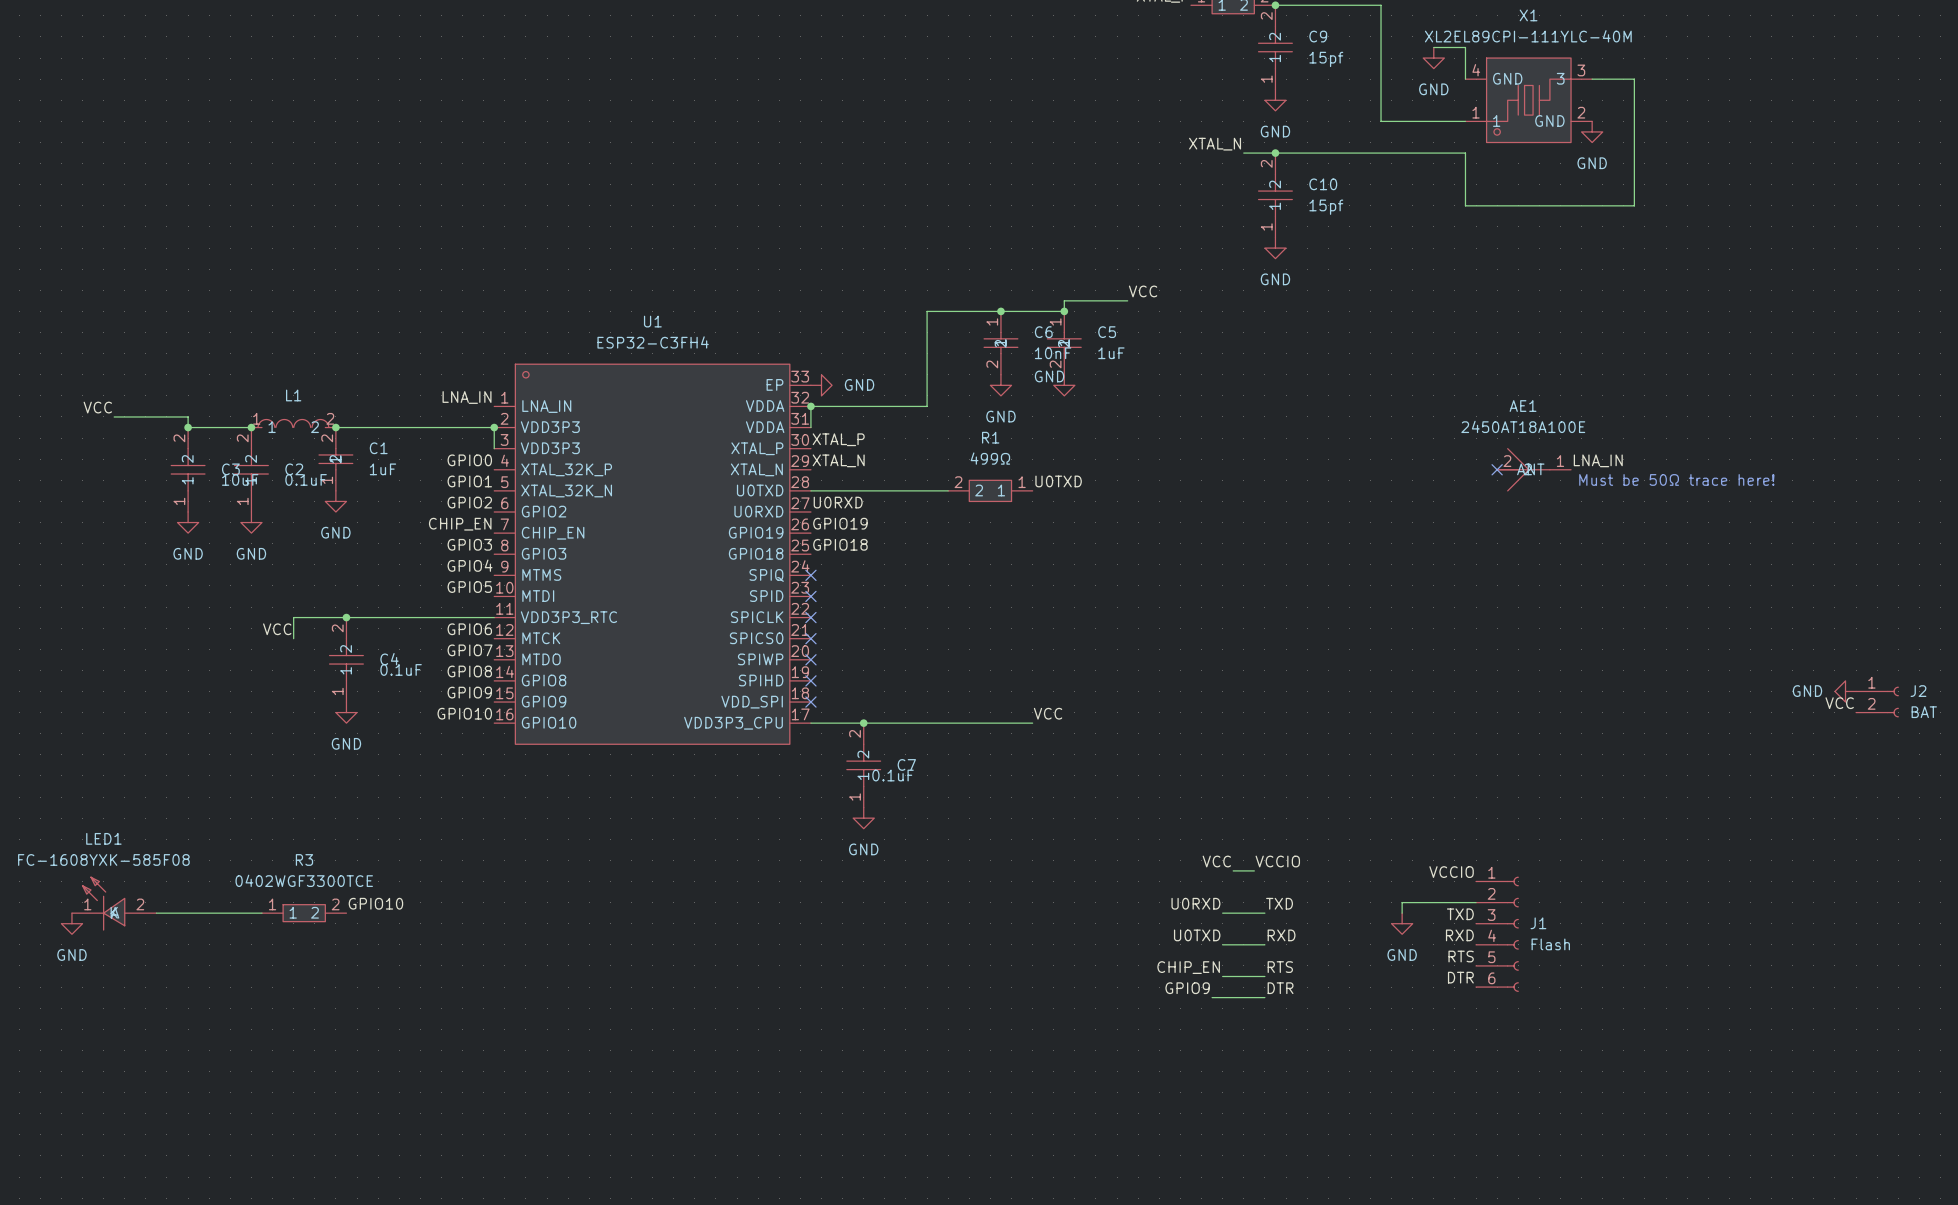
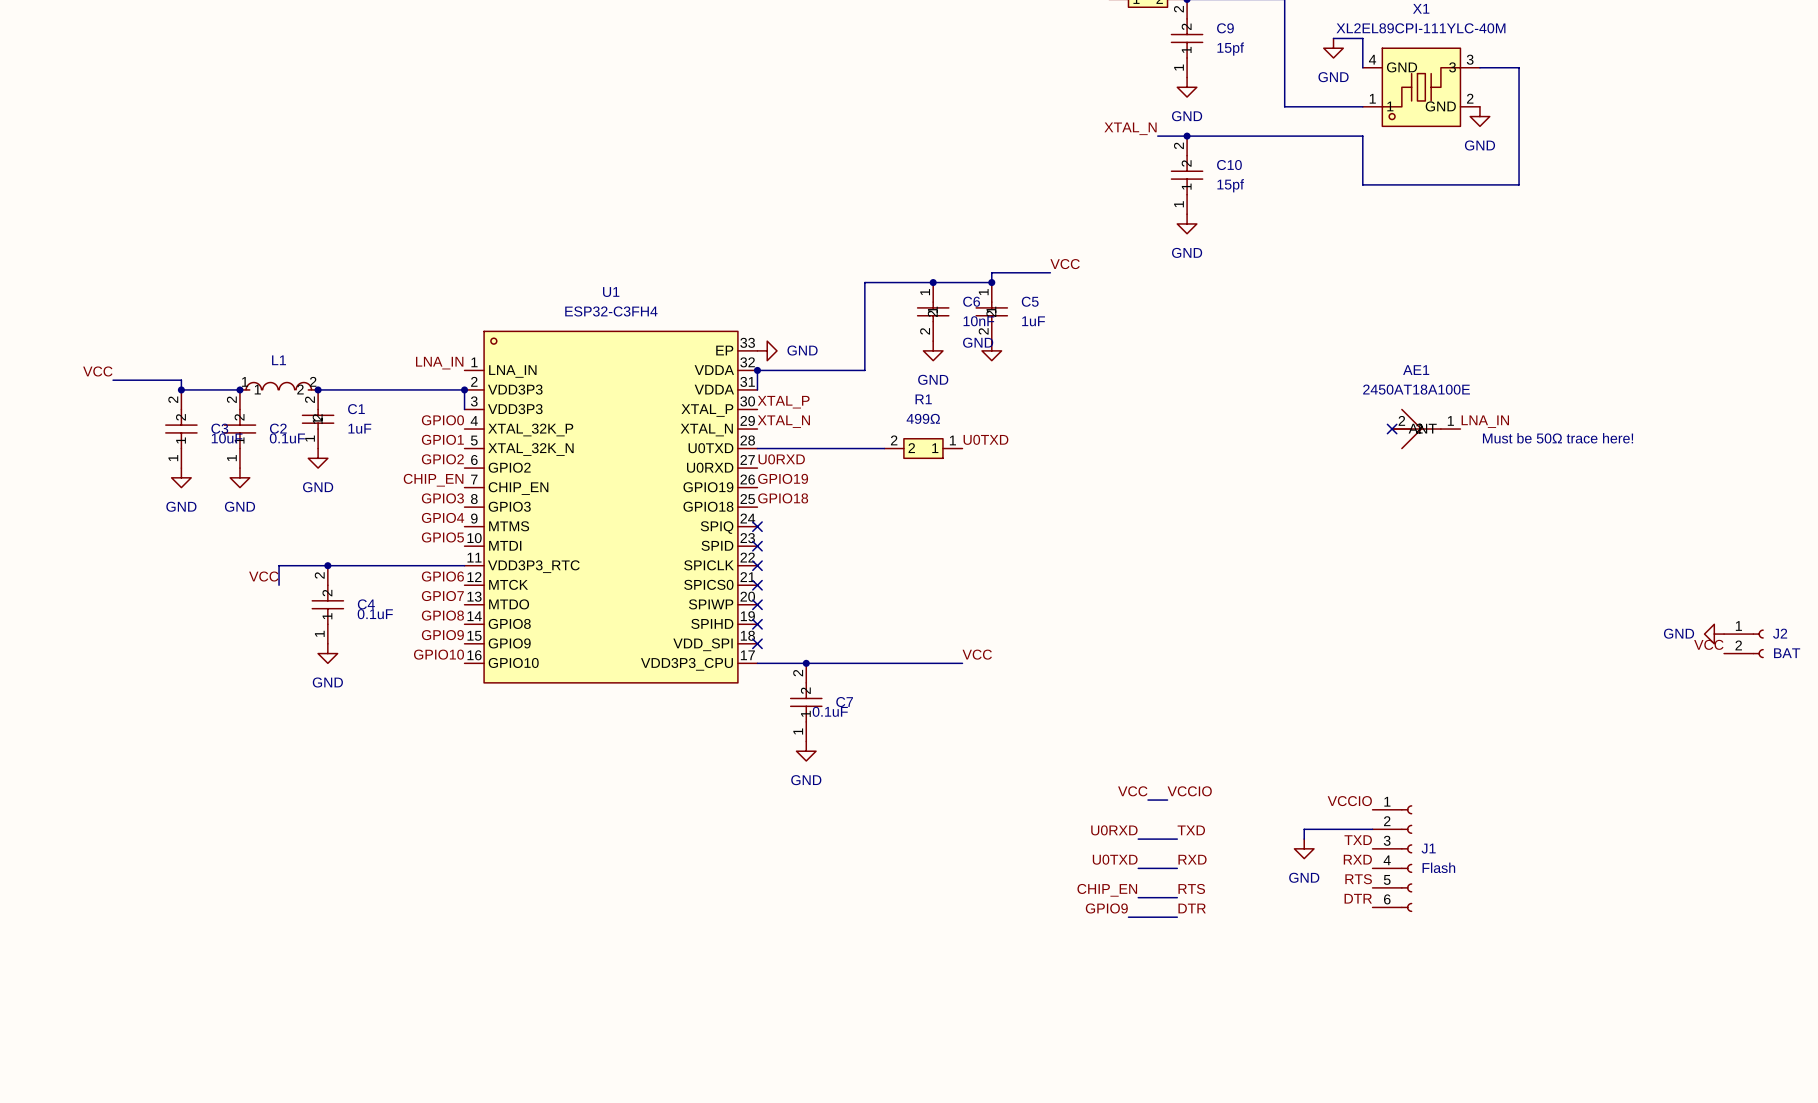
LED1: FC-1608YXK-585F08 (114, 903) -> none
label: GPIO10 (375, 903) -> none
wire: (156, 913) (261, 913) -> none
R3: 0402WGF3300TCE (304, 913) -> none
power symbol: GND (71, 923) -> none

